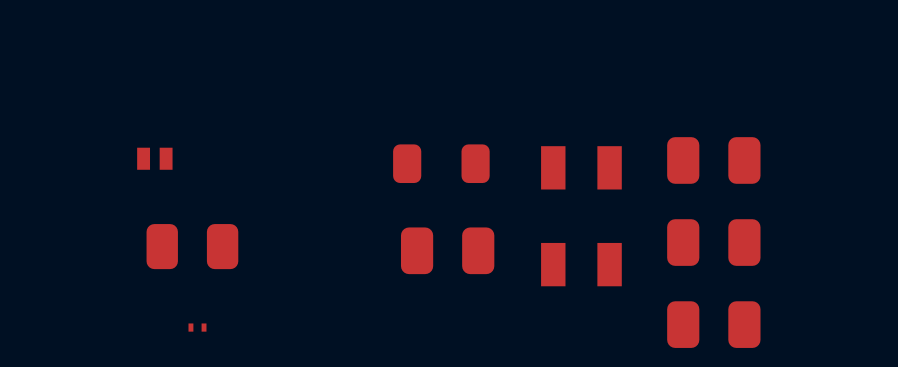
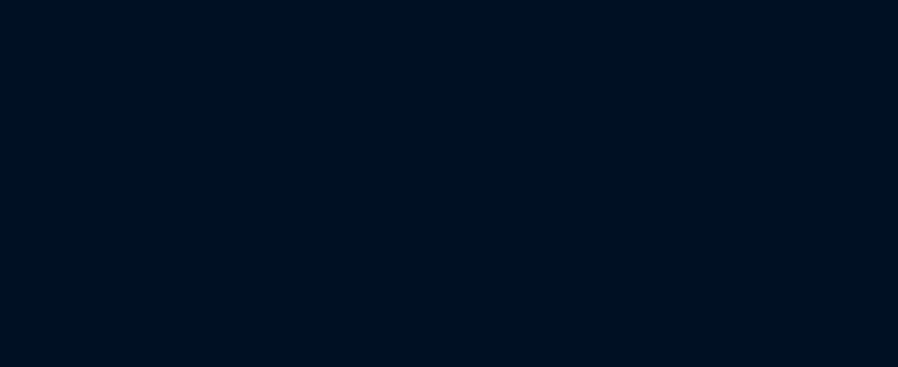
part: (154, 158) -> none
part: (713, 160) -> none
part: (441, 163) -> none
part: (581, 167) -> none
part: (713, 242) -> none
part: (192, 246) -> none
part: (447, 250) -> none
part: (581, 264) -> none
part: (713, 324) -> none
part: (197, 327) -> none

